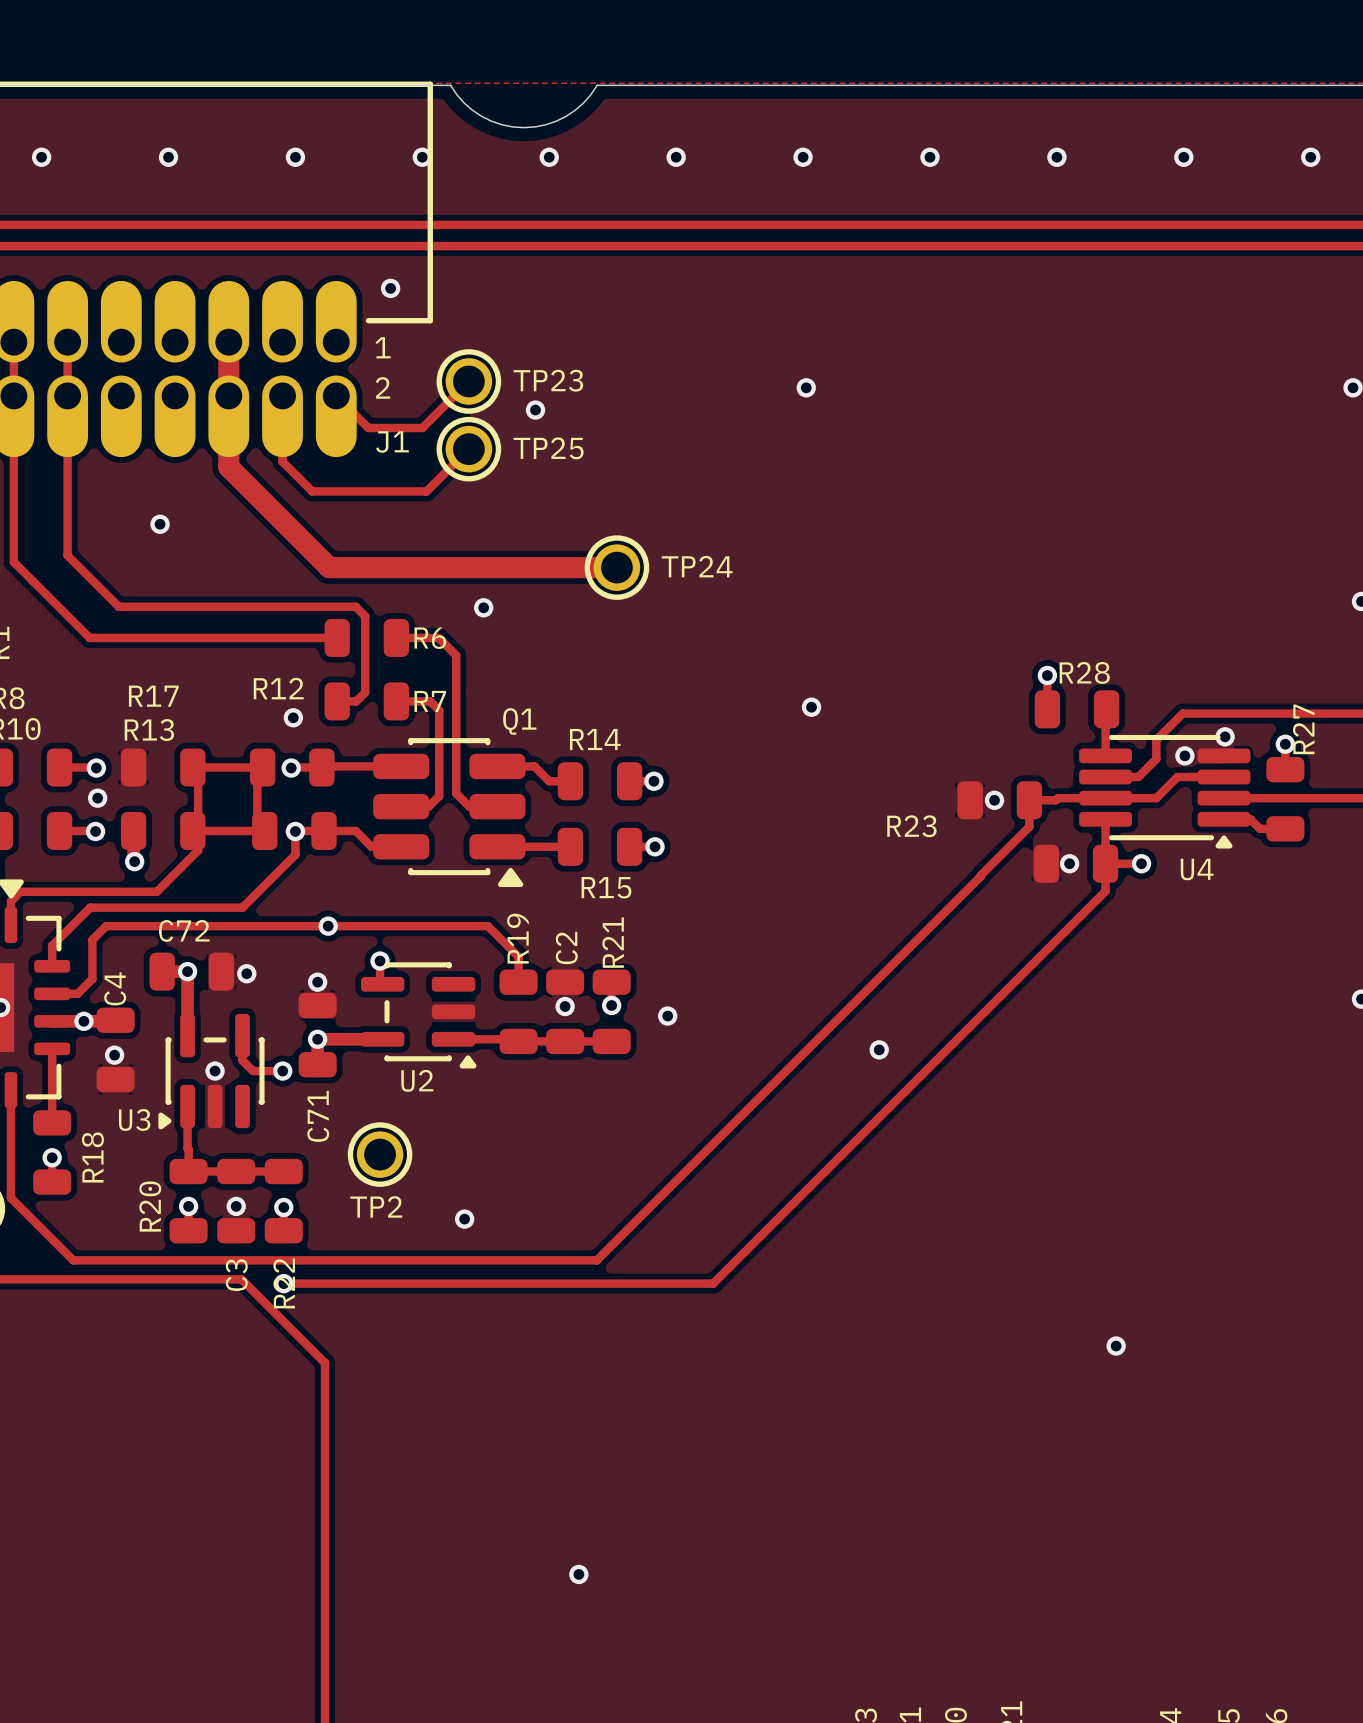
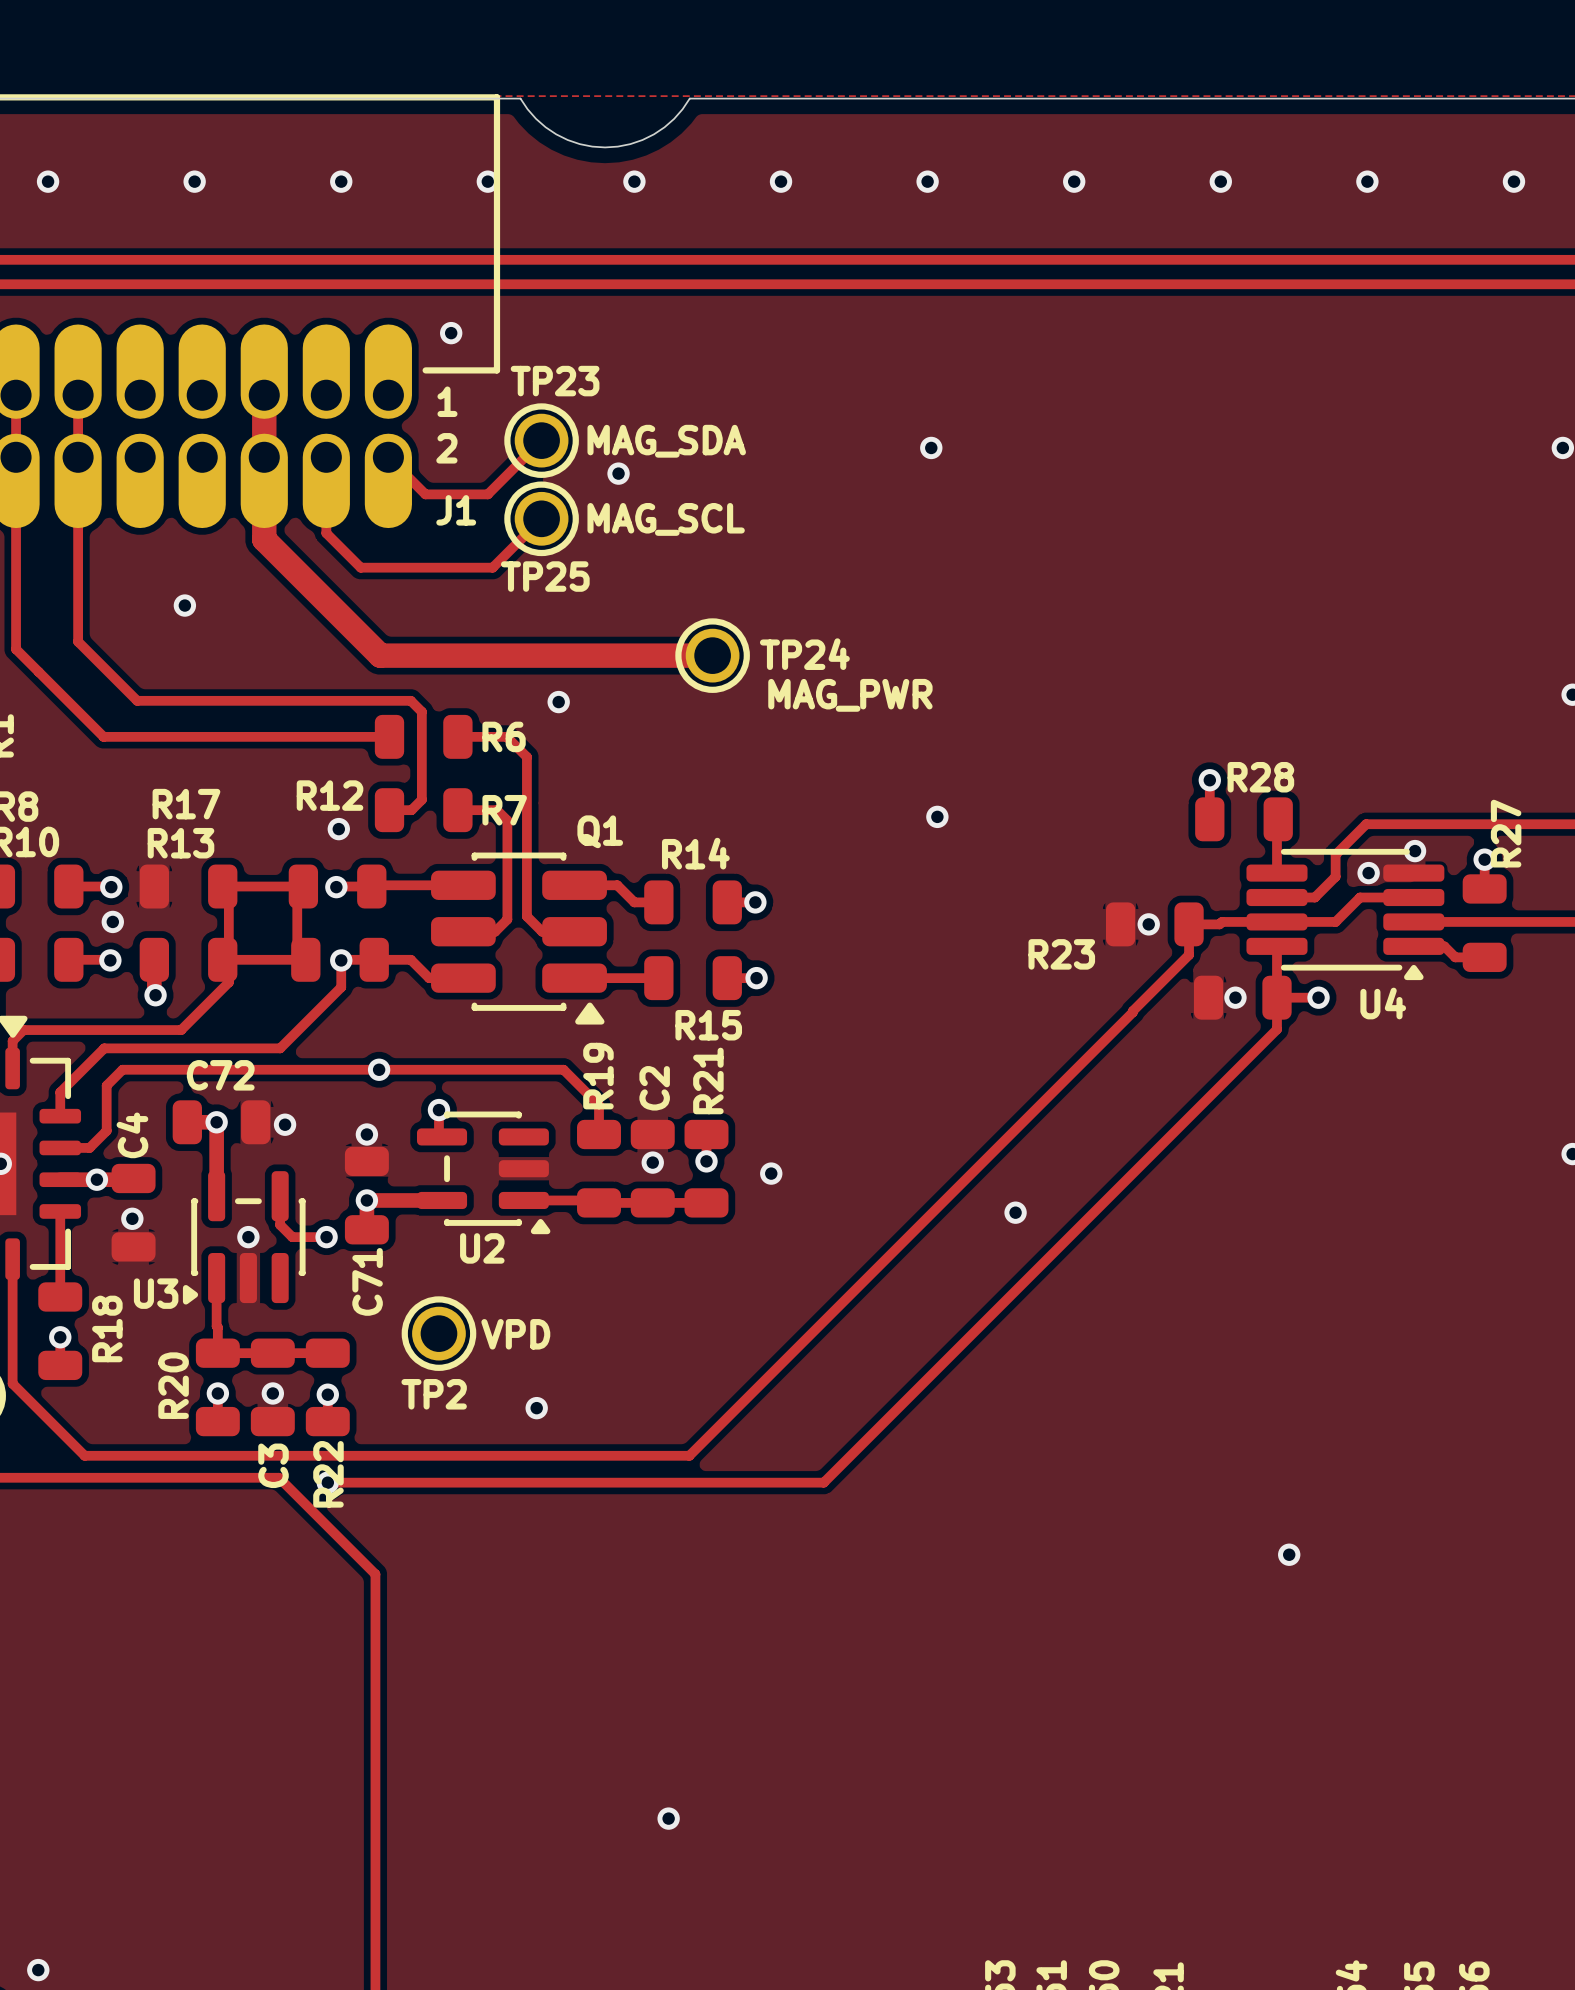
TP23 name position: TP23 (548, 380) -> TP23 (555, 381)
text: none -> MAG_SDA (666, 441)
TP25 name position: TP25 (548, 448) -> TP25 (545, 576)
text: none -> MAG_SCL (666, 519)
text: none -> MAG_PWR (850, 695)
text: none -> VPD (515, 1334)
via: none -> (38, 1970)

